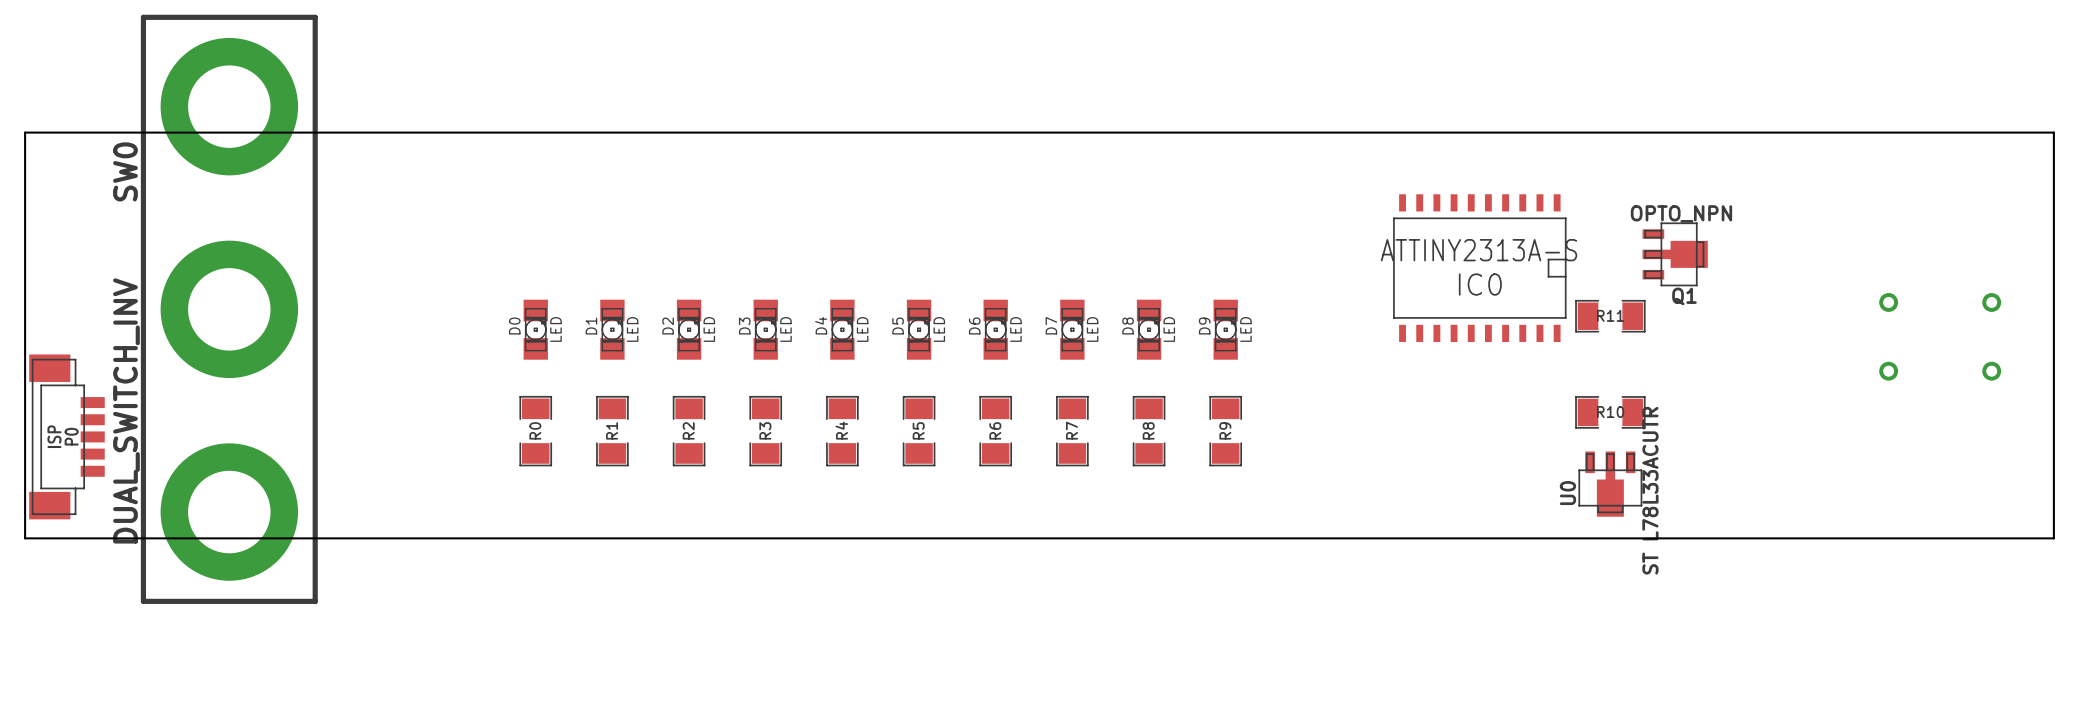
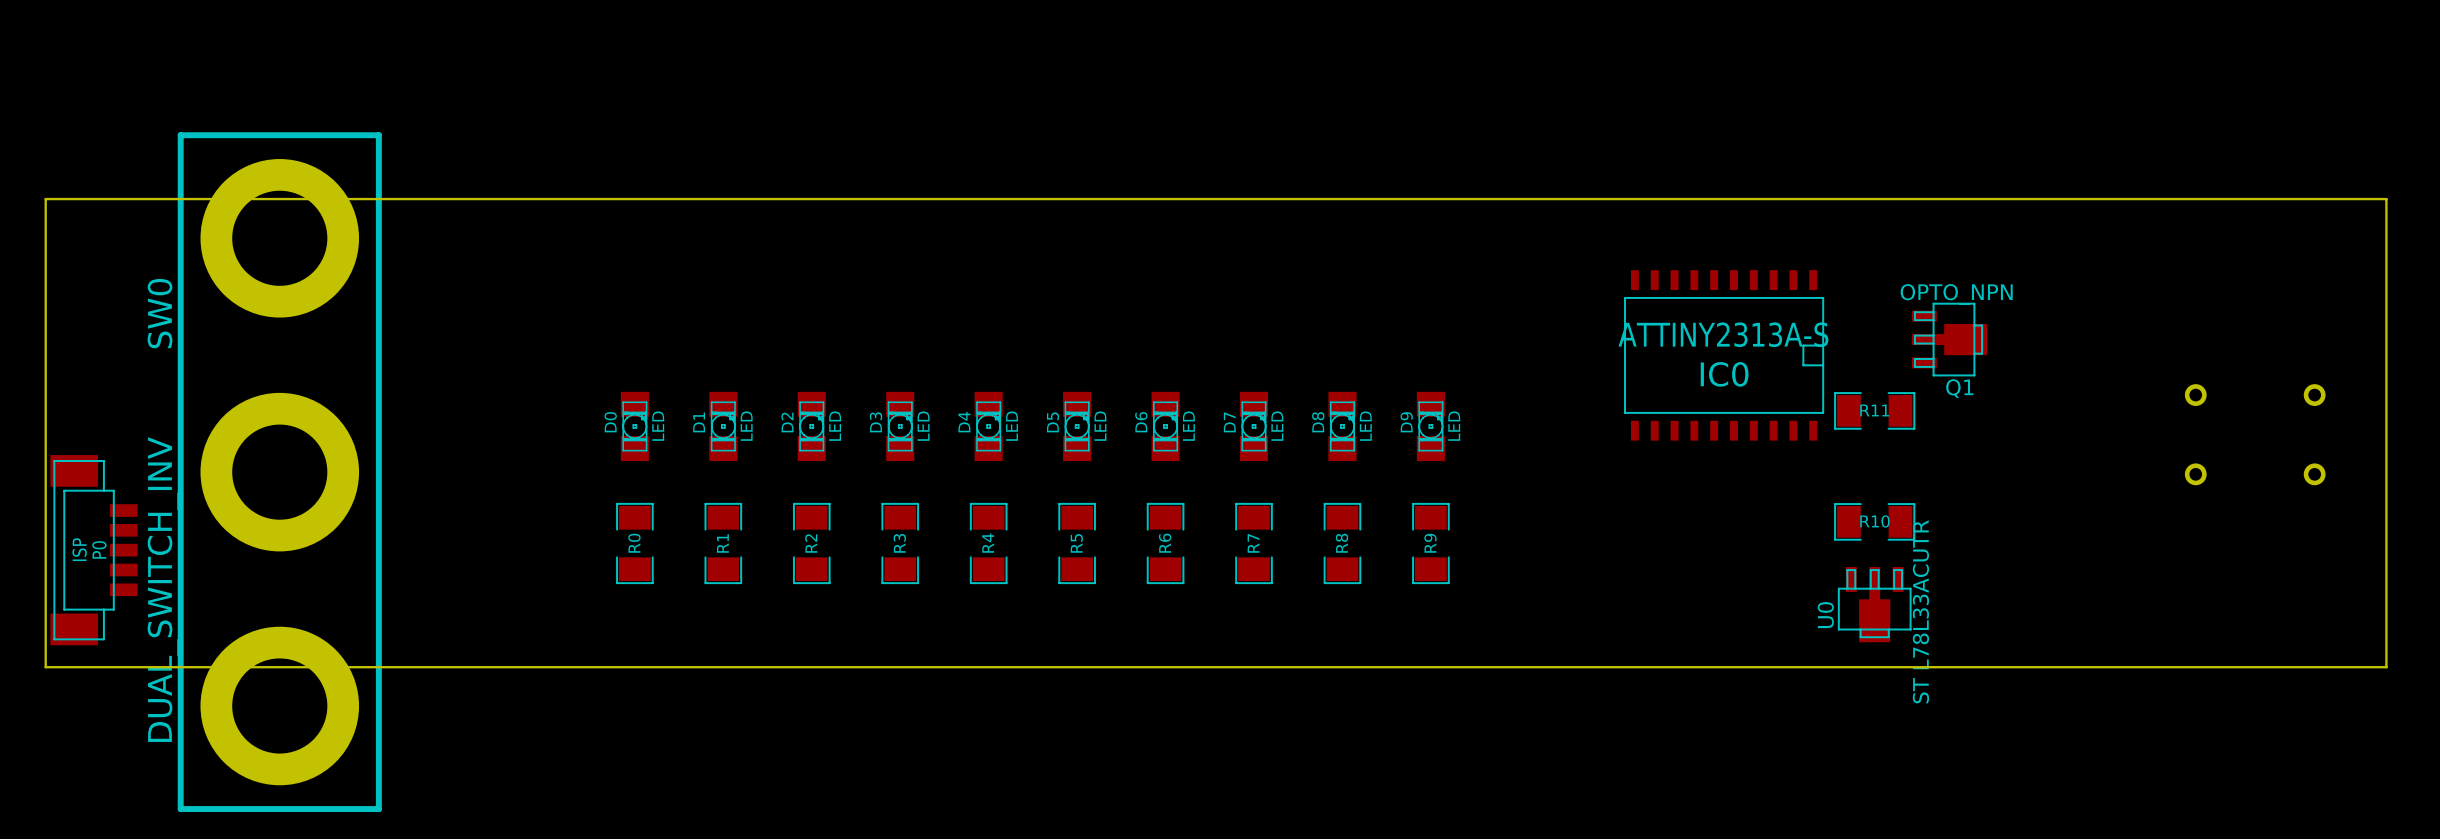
SW0 position: (229, 309) -> (279, 472)

